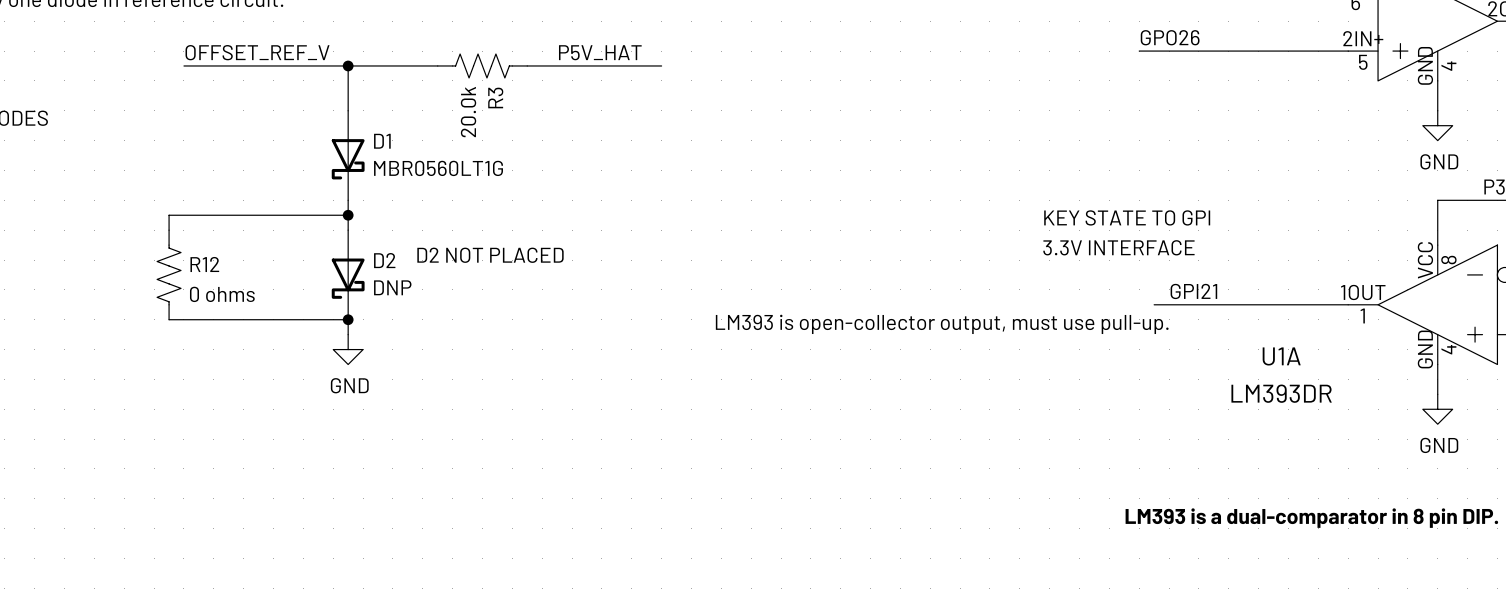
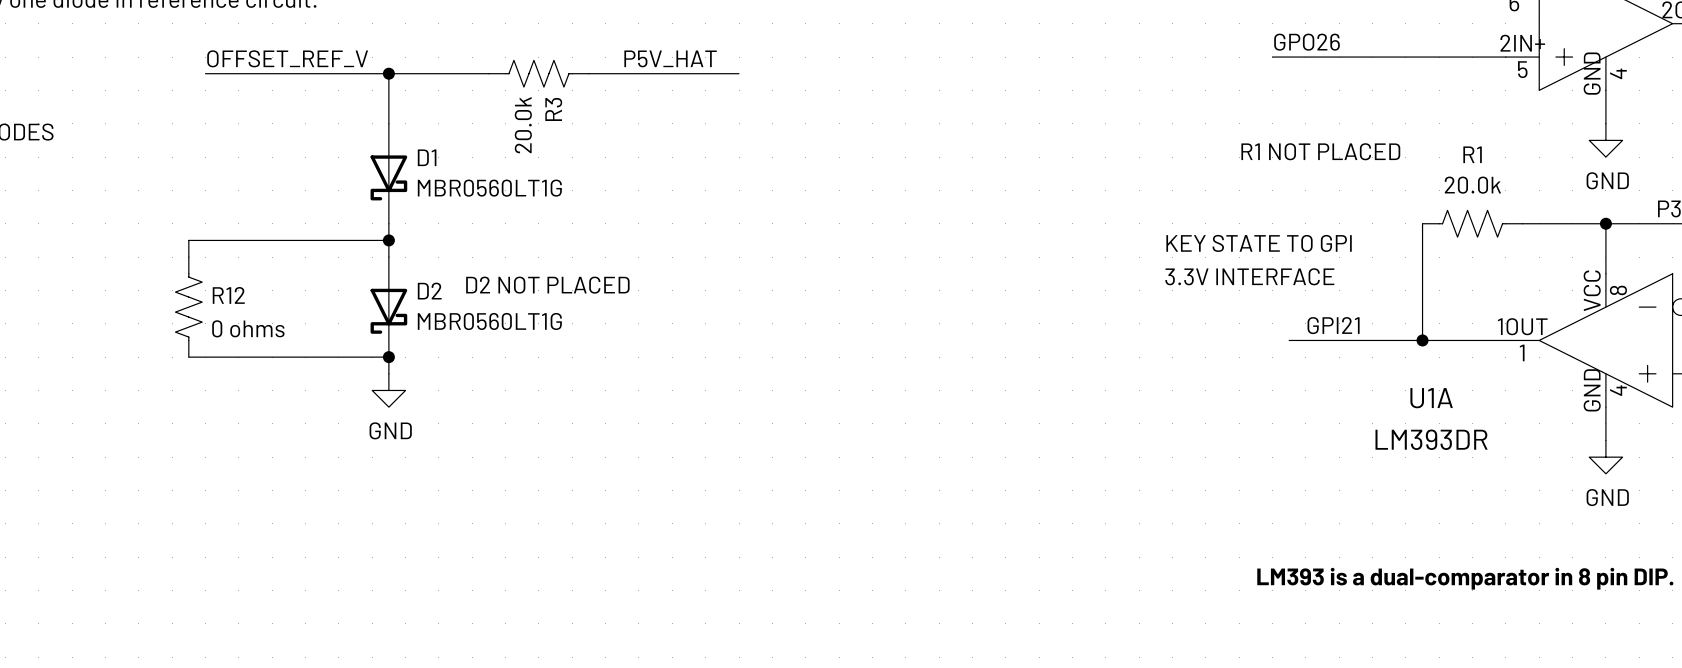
text: none -> R1 NOT PLACED (1320, 151)
wire: none -> (1422, 223) (1422, 340)
R1: none -> 20.0k (1472, 223)
wire: none -> (1522, 223) (1605, 223)
junction: none -> (1605, 223)
D2 value: DNP (392, 287) -> MBR0560LT1G (489, 321)
junction: none -> (1422, 340)
text: LM393 is open-collector output, must use pull-up. (942, 324) -> none

